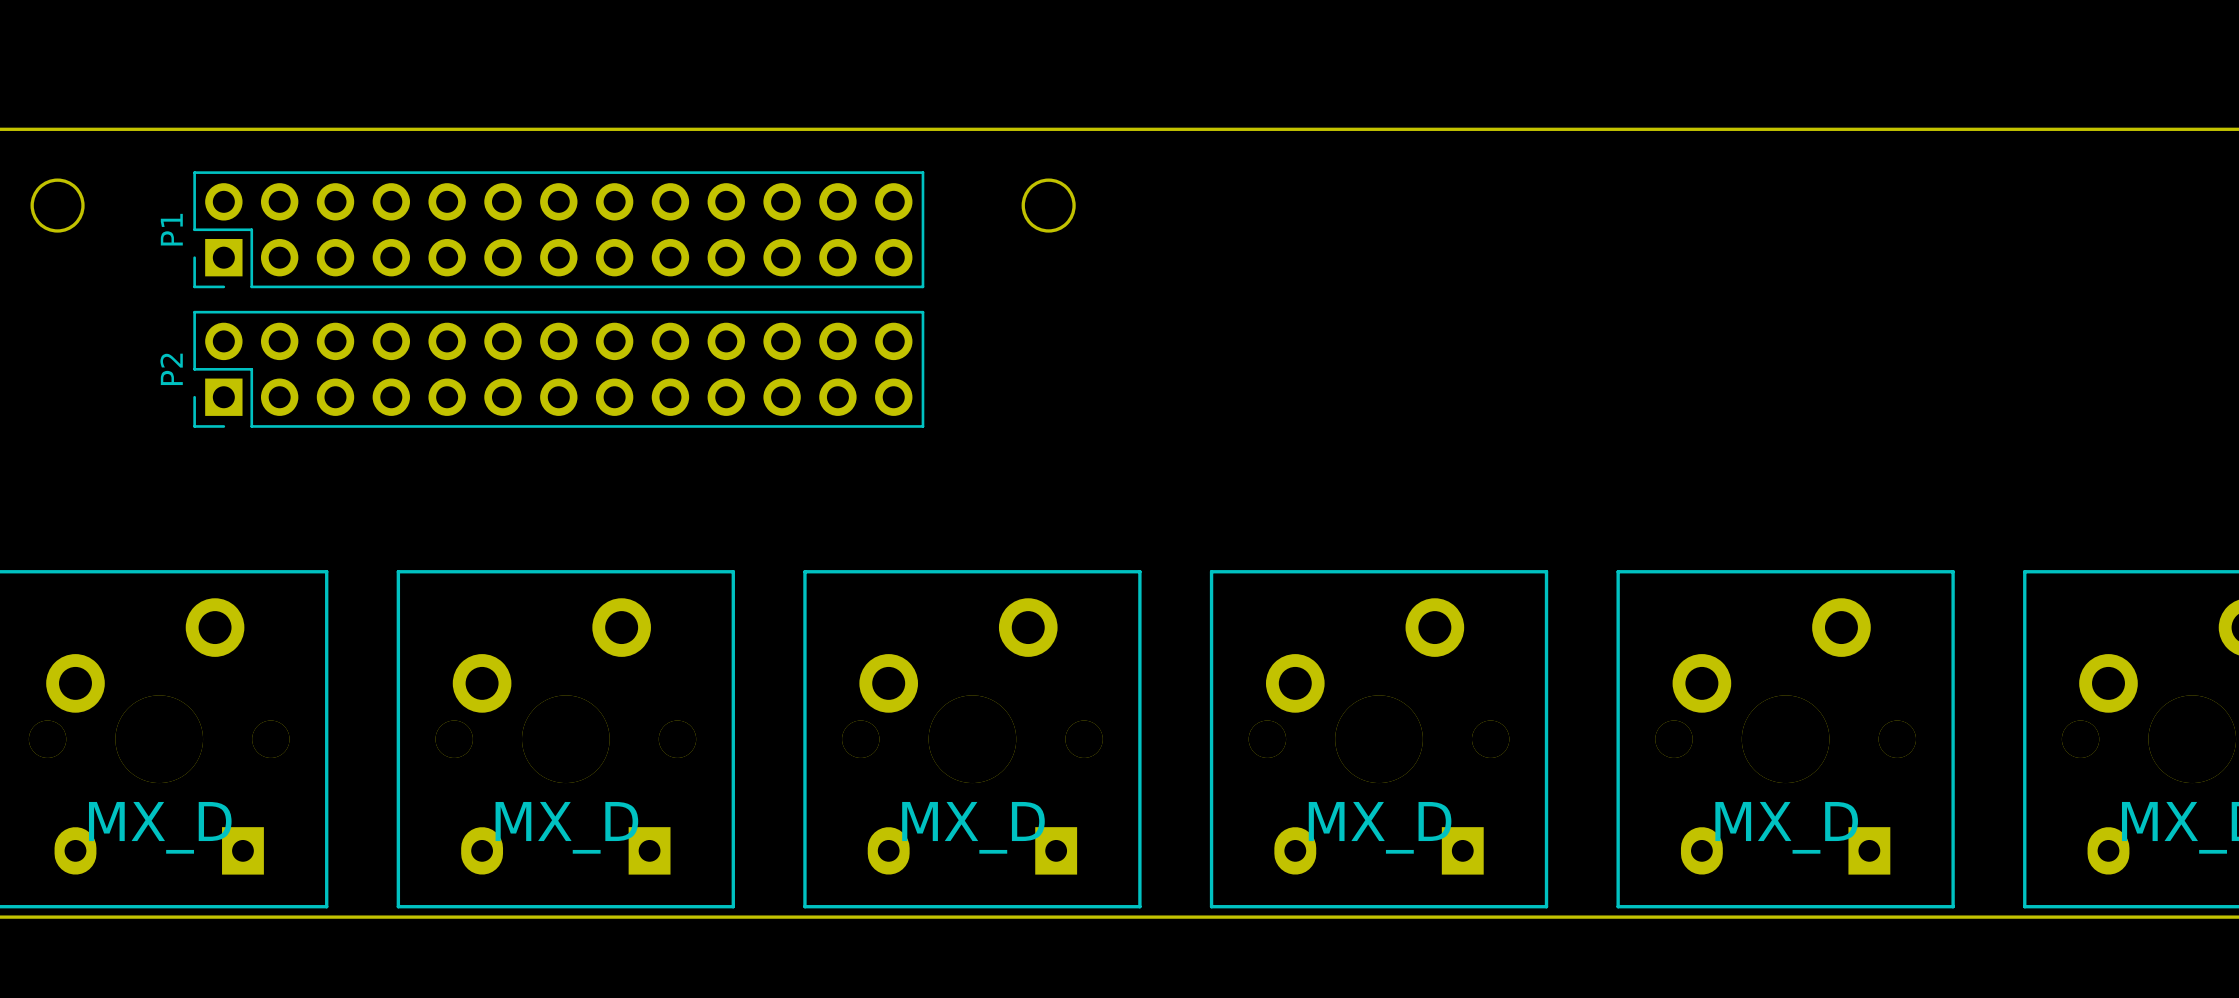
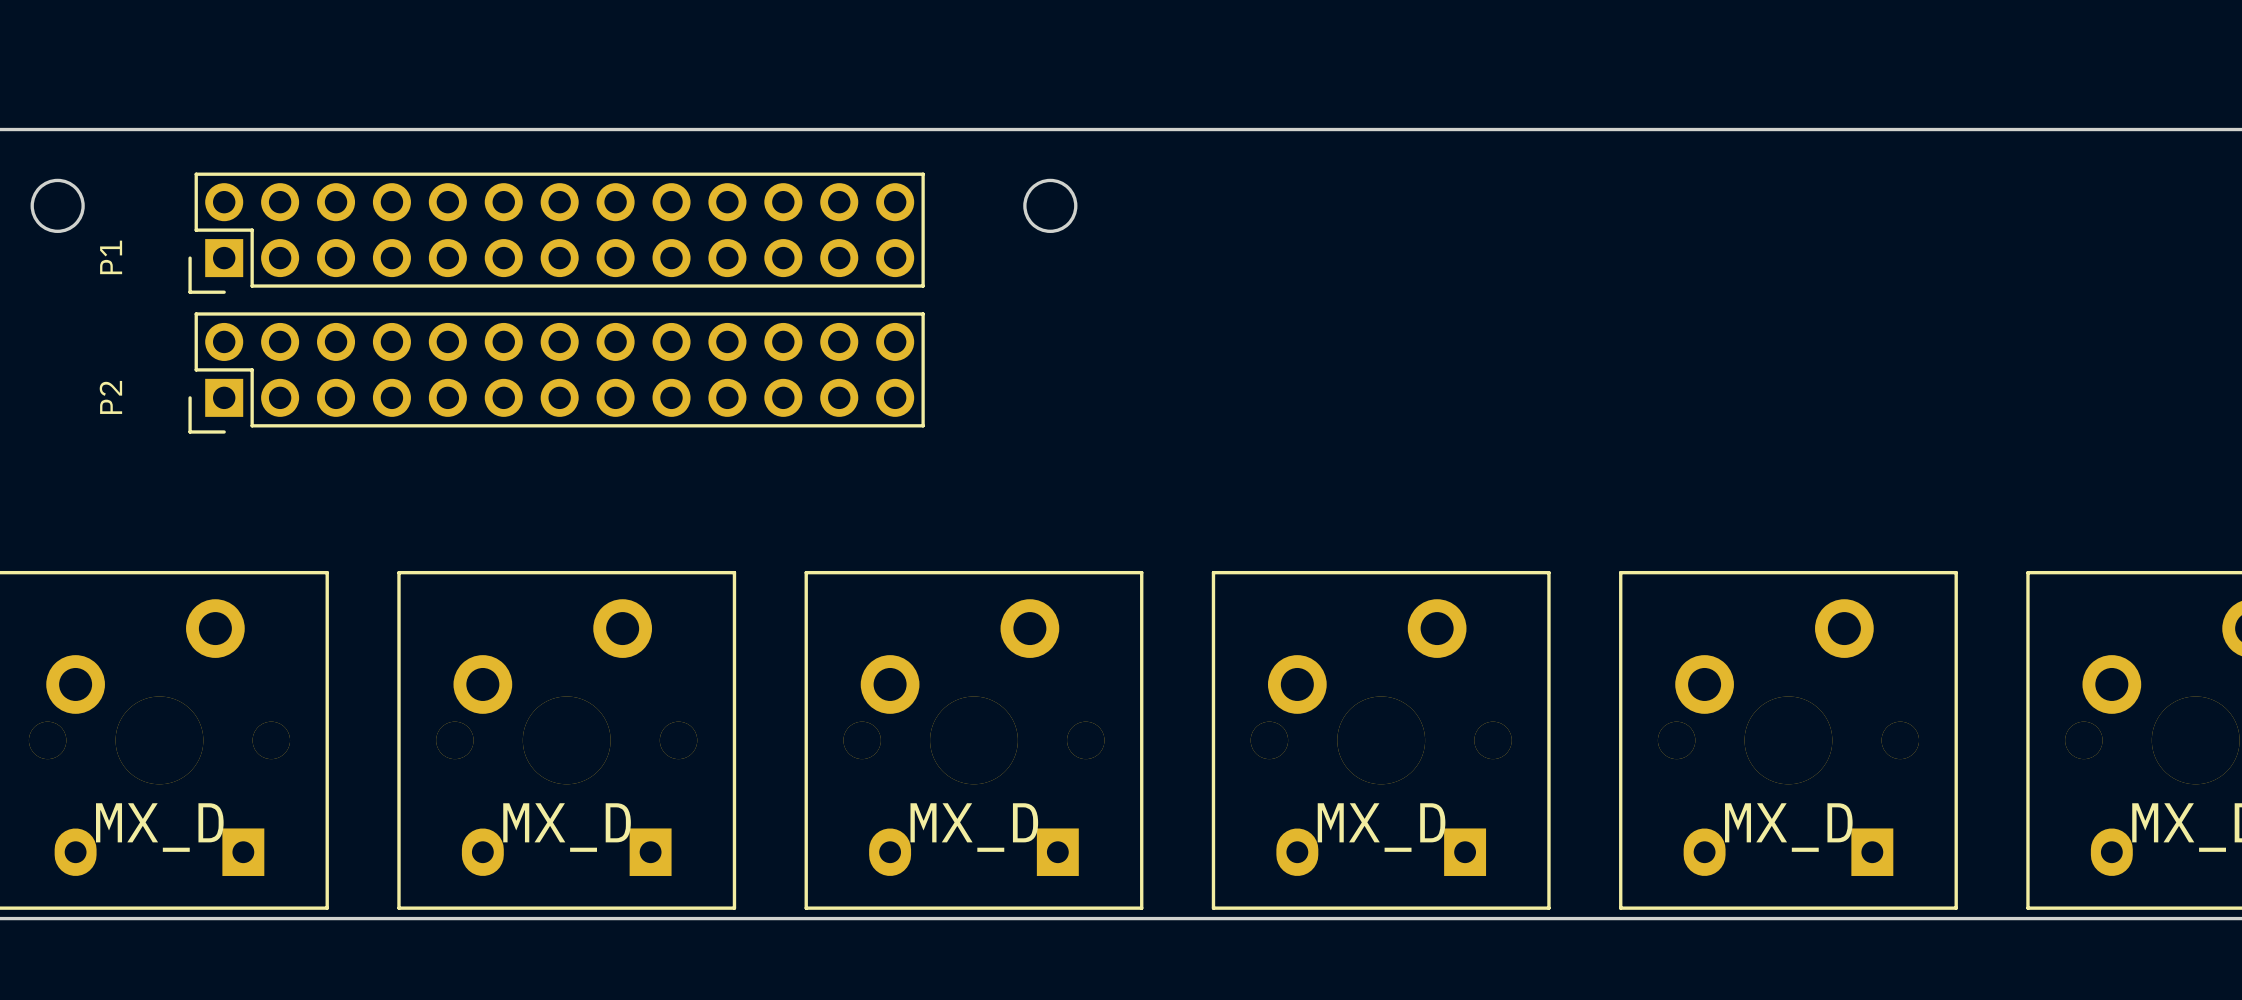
P1 footprint: [193, 171, 925, 289] -> [188, 172, 925, 294]
P1 name position: P1 (171, 229) -> P1 (111, 257)
P2 footprint: [193, 310, 925, 428] -> [188, 312, 925, 434]
P2 name position: P2 (171, 369) -> P2 (110, 397)

